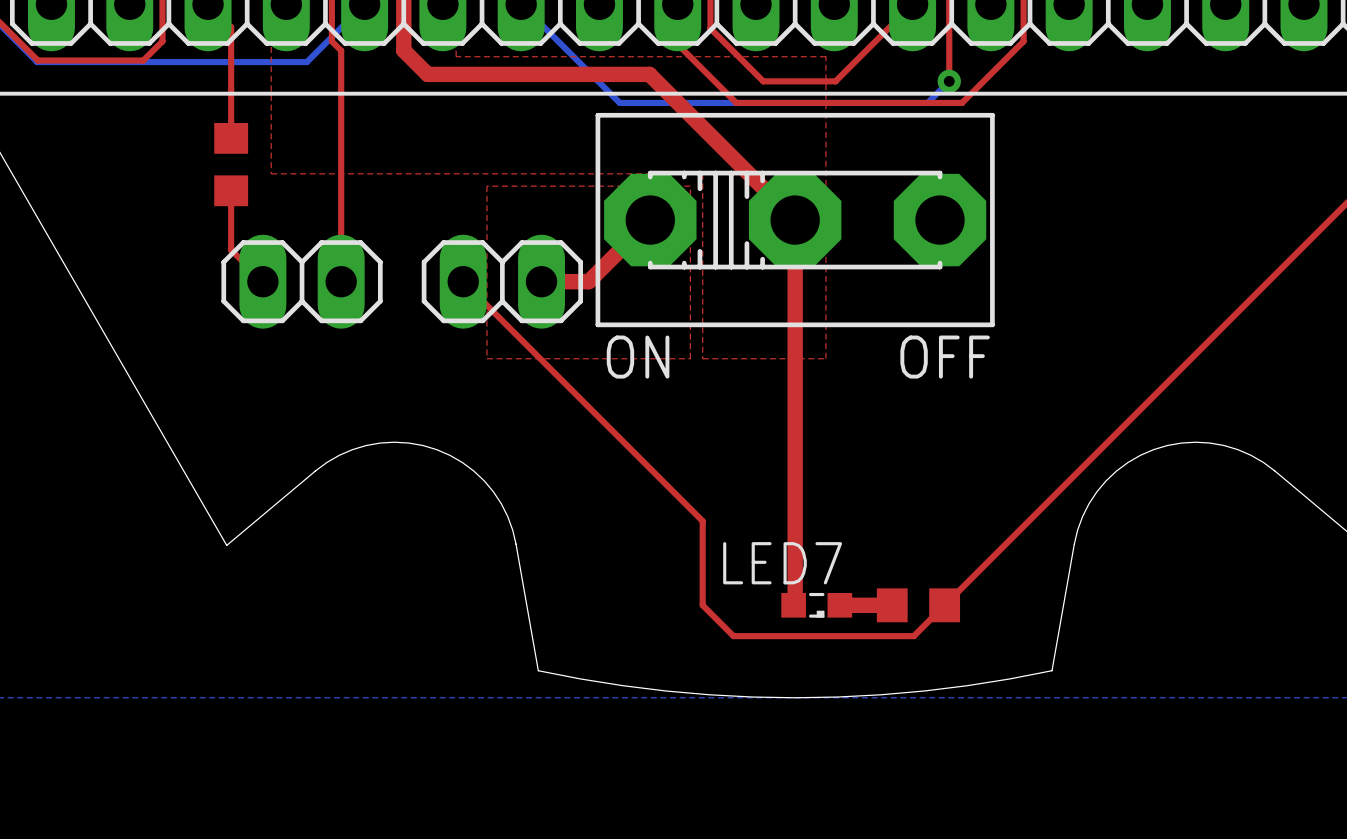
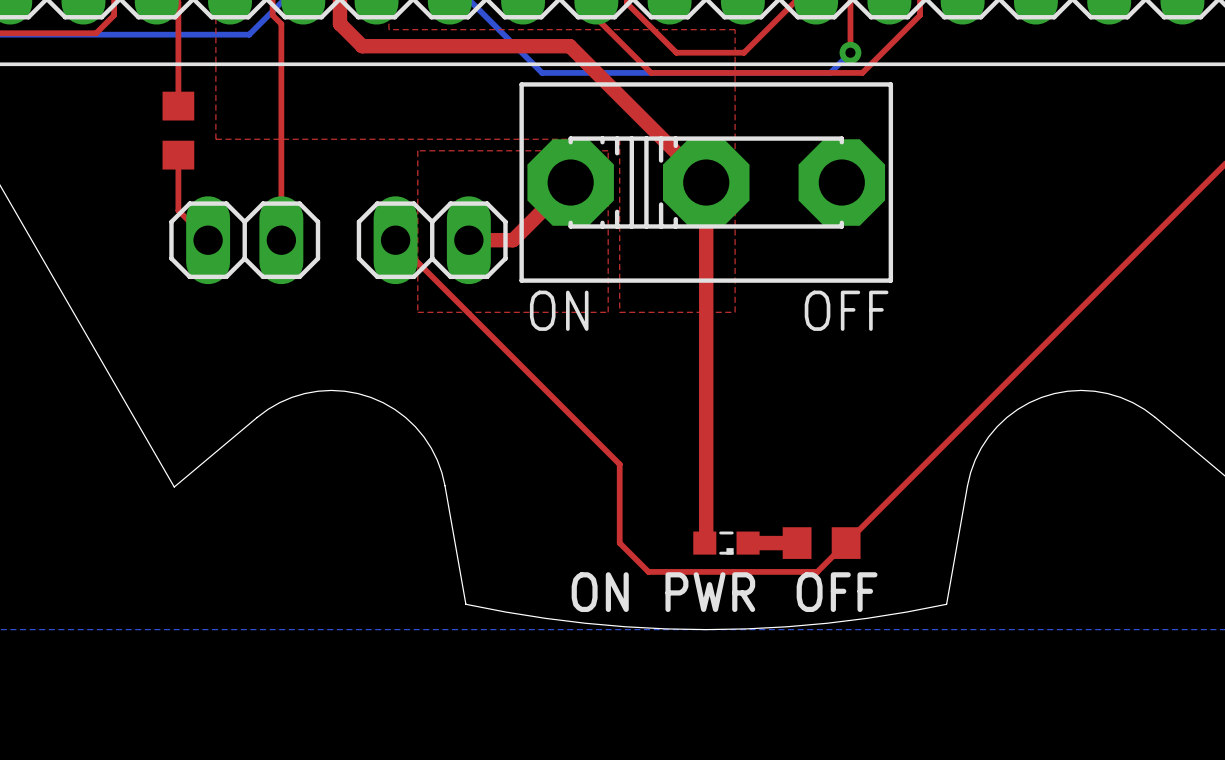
LED7 name: LED7 (782, 563) -> none
text: none -> ON (600, 592)
text: none -> PWR (710, 592)
text: none -> OFF (837, 592)

